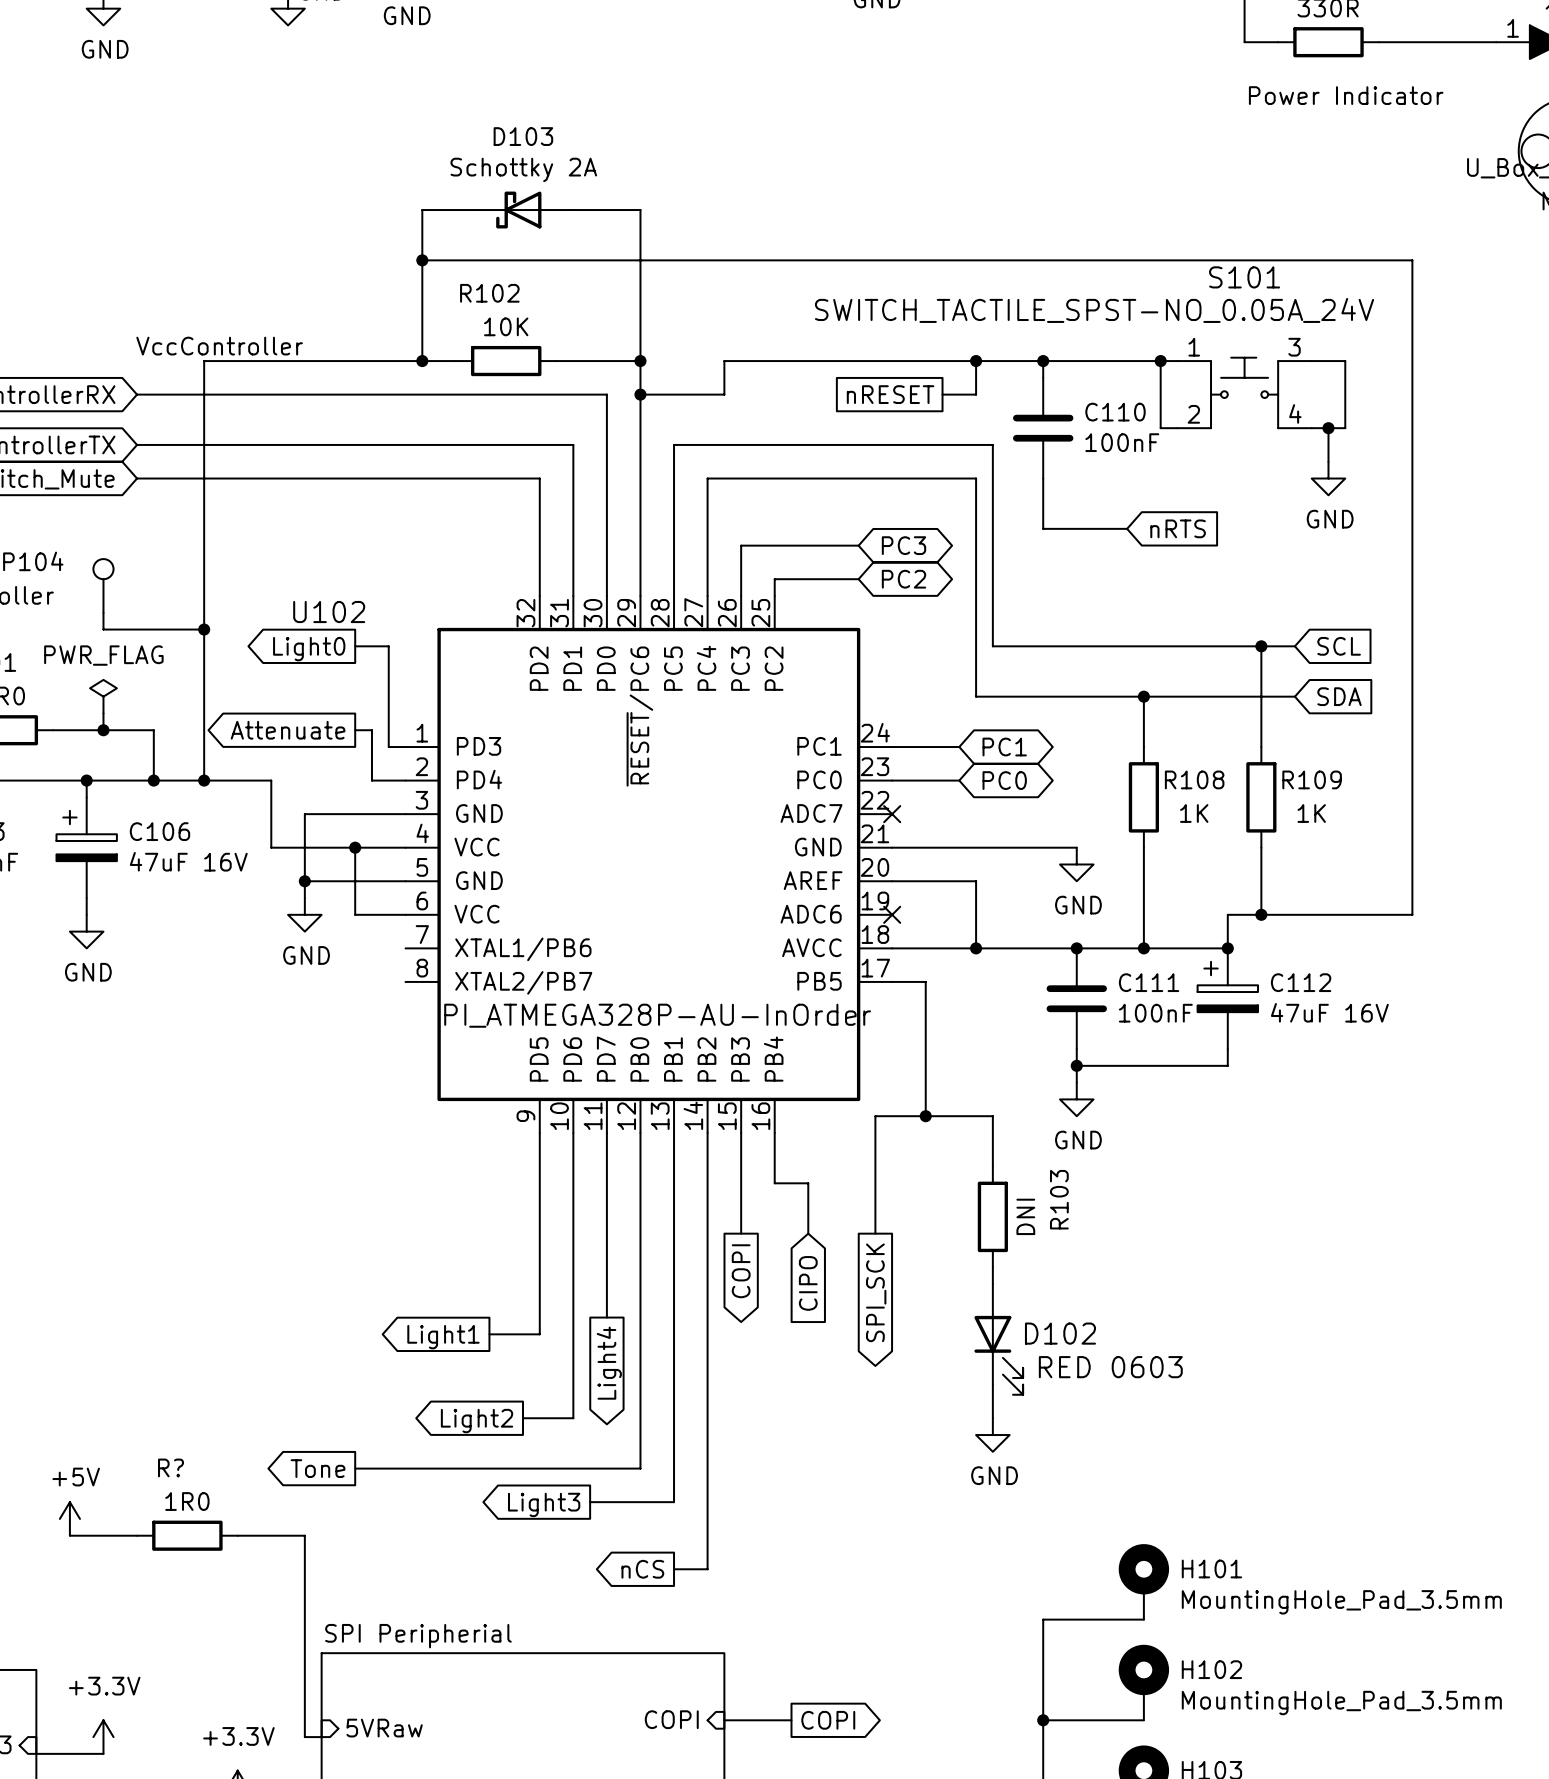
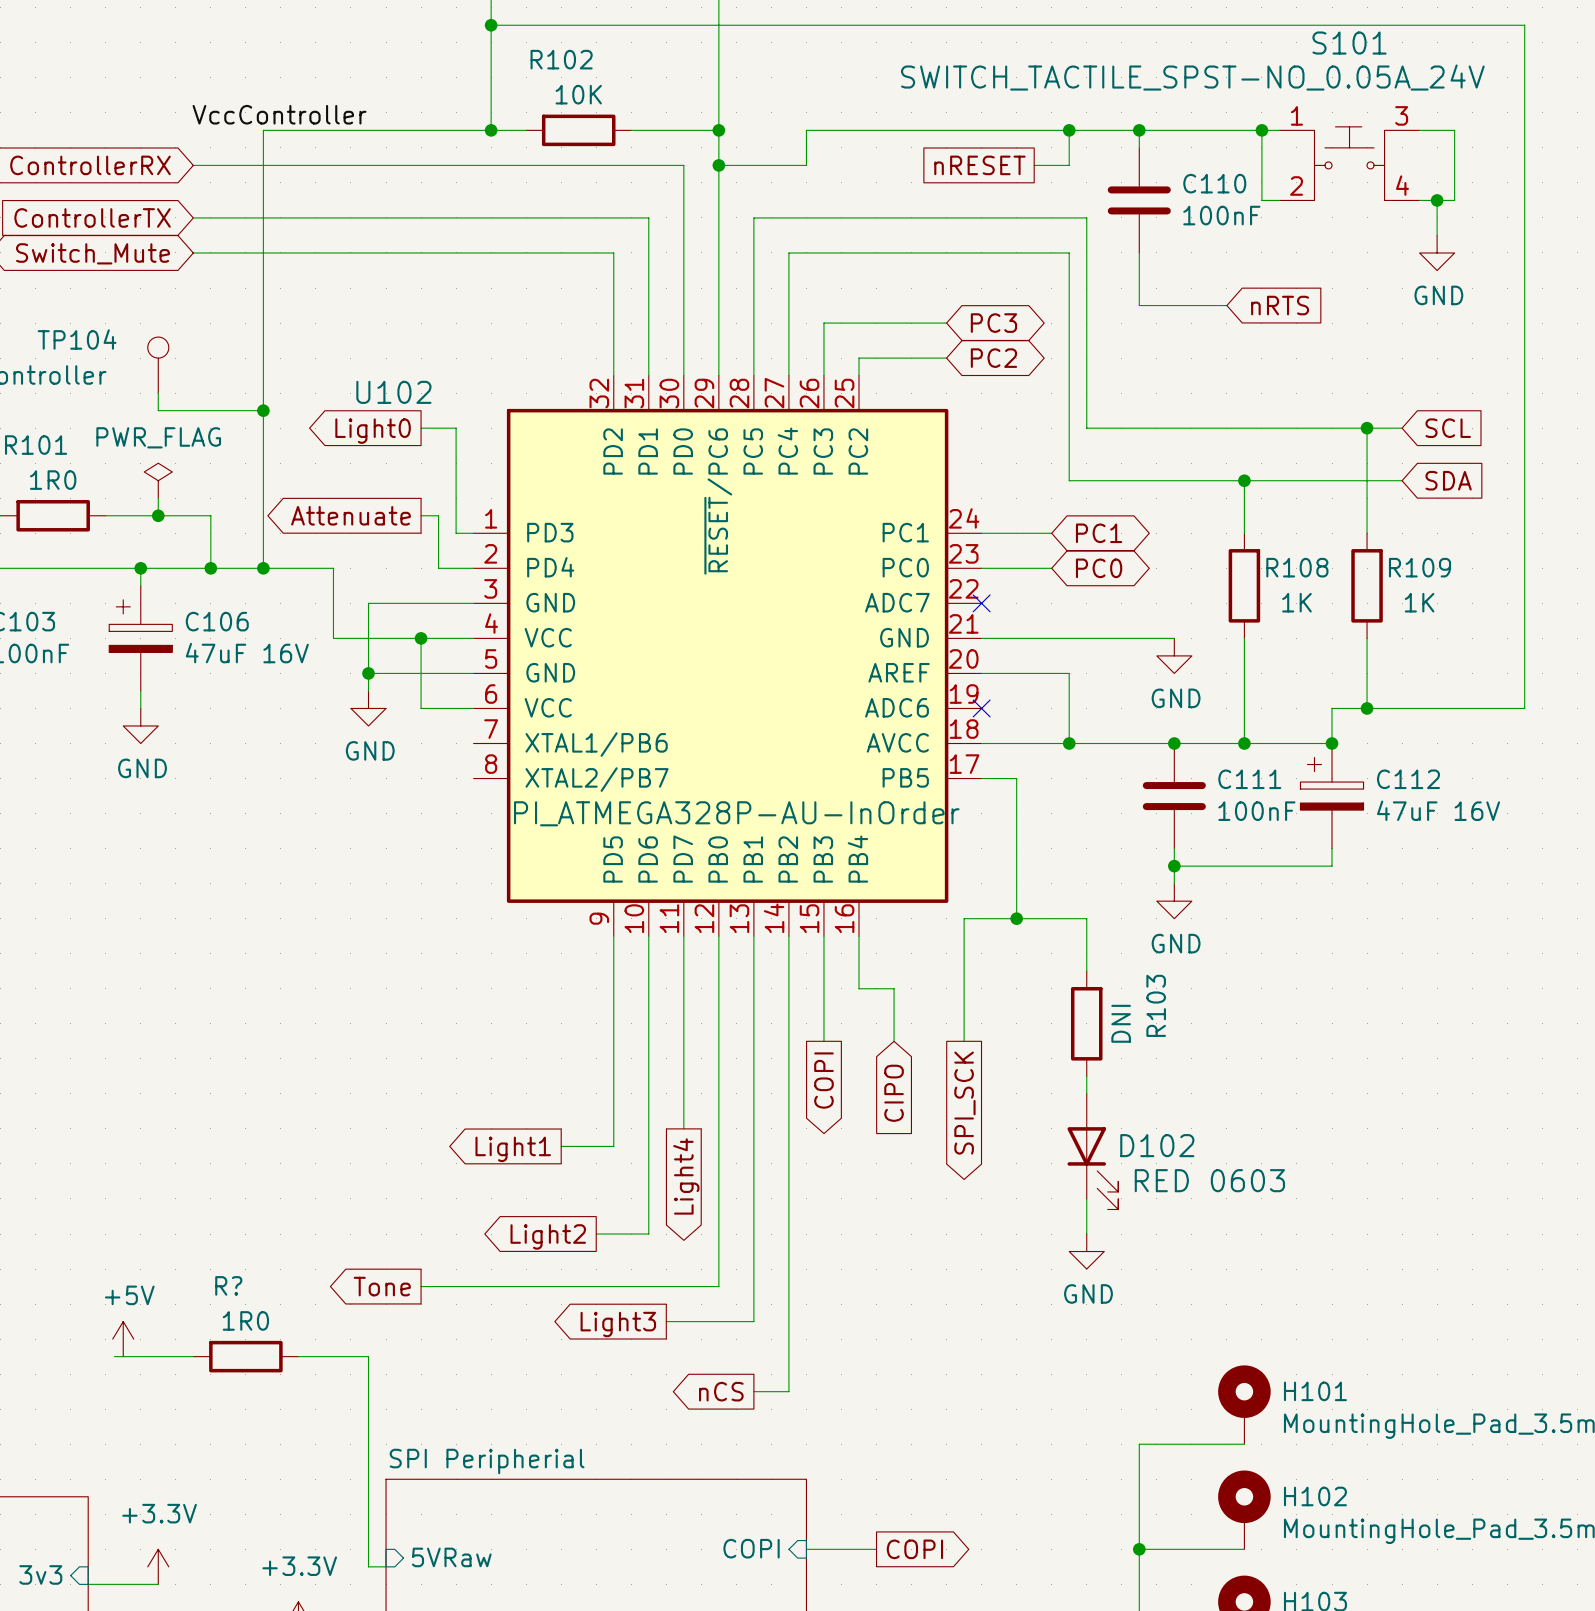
wire: none -> (114, 1356) (123, 1356)

